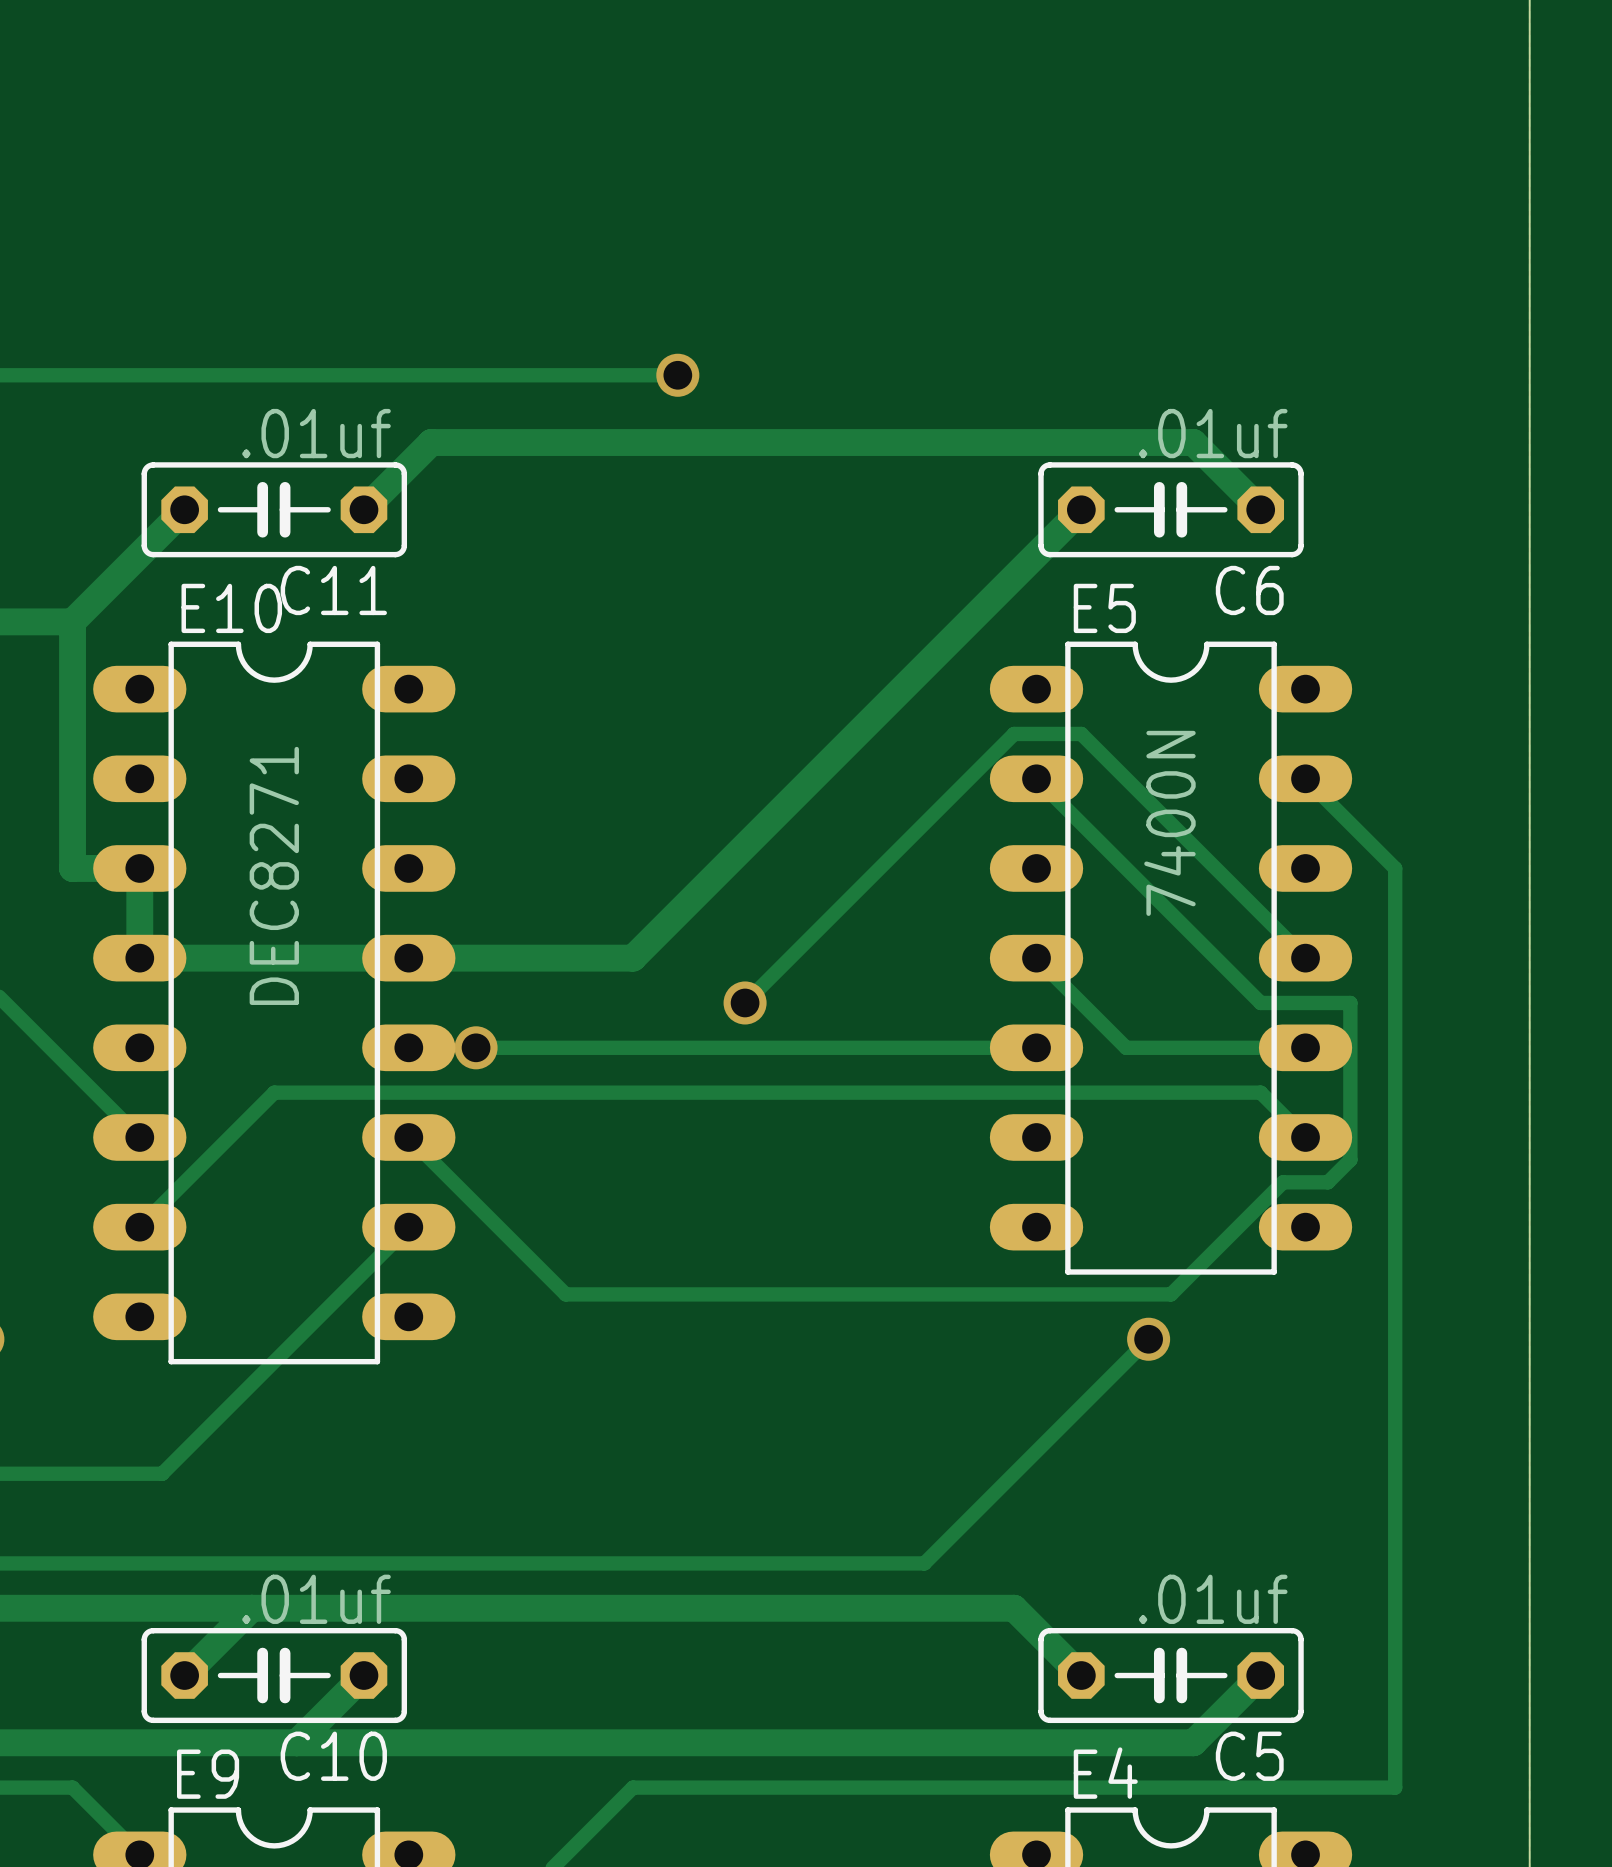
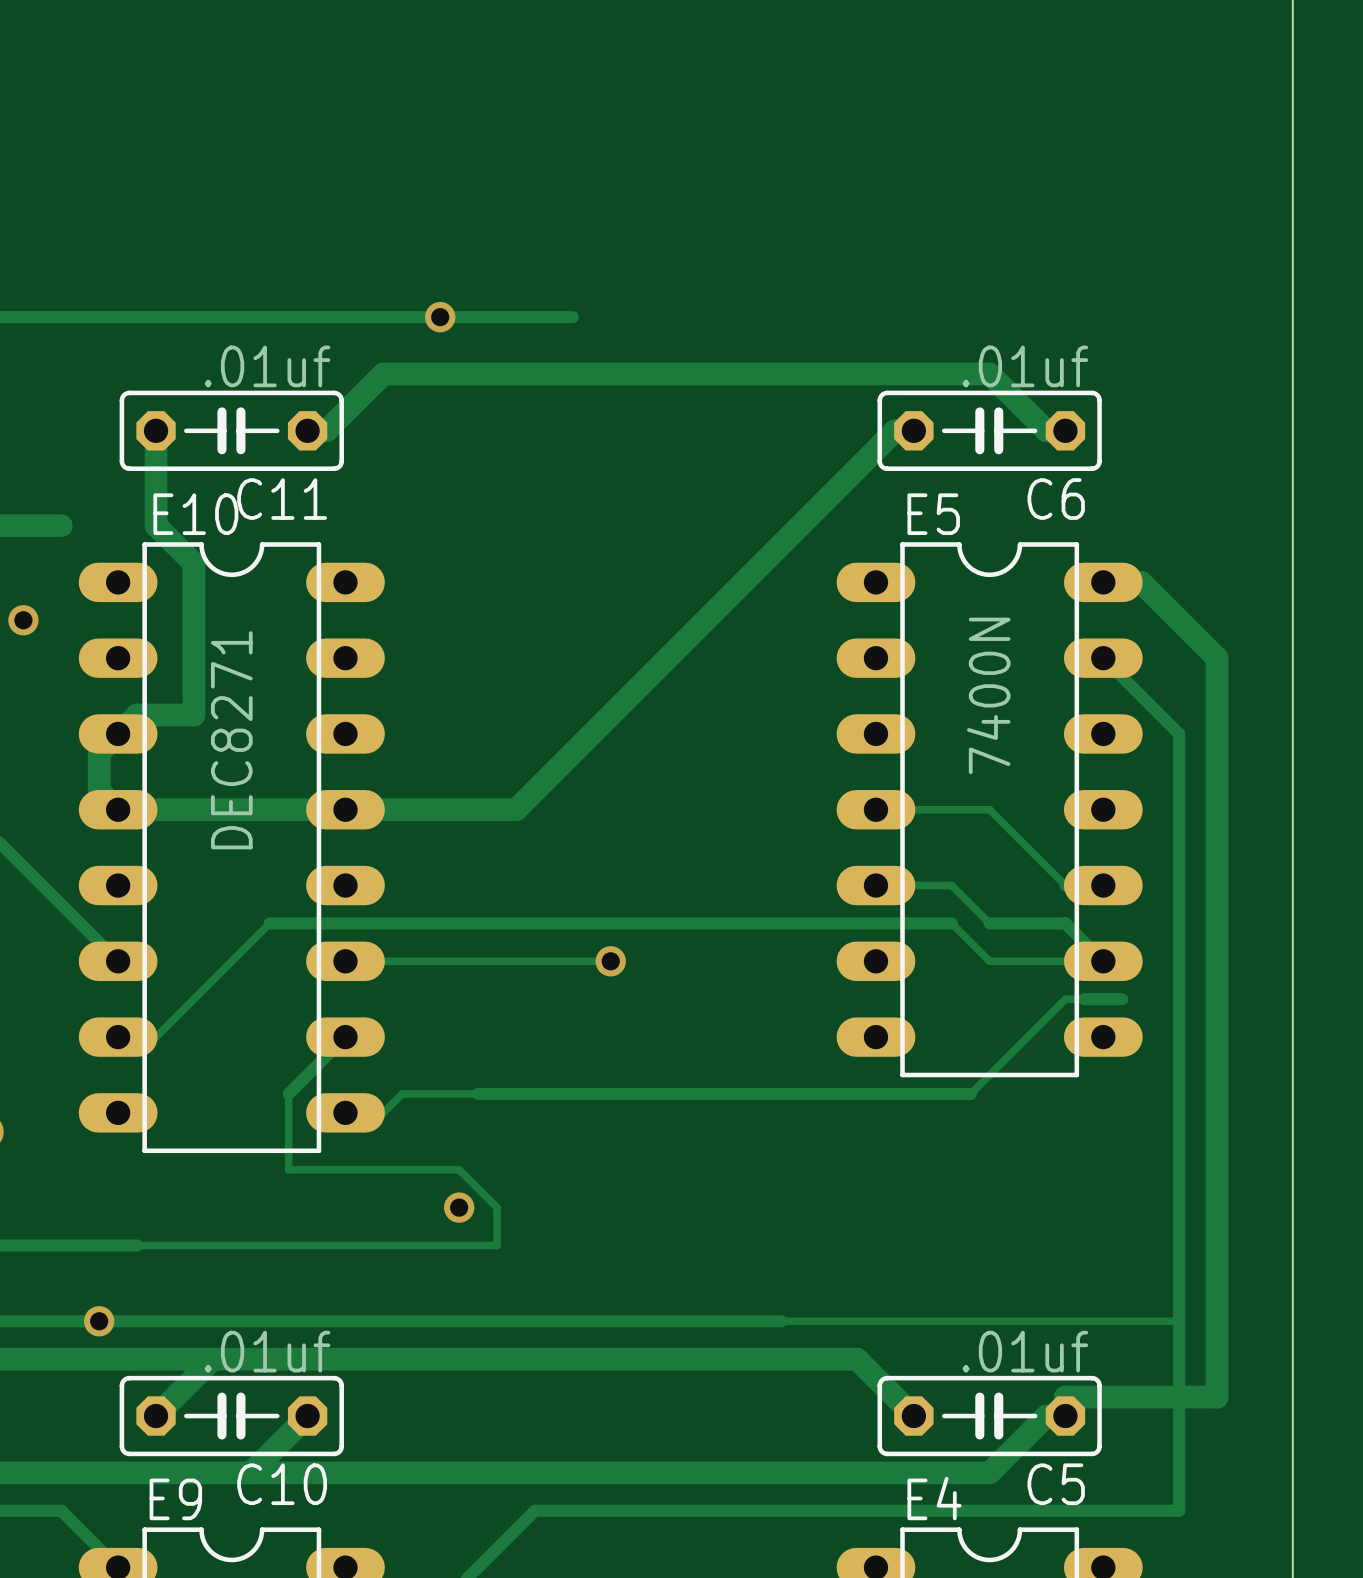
via: none -> (440, 317)
via: (677, 375) -> none
track: (453, 442) (431, 442) (363, 509) -> (383, 373) (326, 430) (307, 430)
track: (1171, 442) (1193, 442) (1260, 509) -> (989, 373) (1046, 430) (1065, 430)
track: (184, 509) (72, 621) (72, 868) (139, 868) (139, 958) -> (156, 430) (156, 525) (193, 563) (193, 715) (137, 715) (99, 752) (99, 790) (118, 809)
track: (1081, 509) (632, 958) (610, 958) -> (913, 430) (894, 430) (516, 809)
via: none -> (23, 620)
track: (1036, 778) (1260, 1002) (1350, 1002) (1350, 1159) (1327, 1182) -> none
track: (1036, 958) (1126, 1047) (1260, 1047) -> (875, 809) (989, 809) (1065, 885)
track: (1305, 958) (1081, 733) (1014, 733) (745, 1002) -> none
via: (745, 1002) -> none
track: (476, 1047) (1036, 1047) -> none
via: (476, 1047) -> none
track: (319, 1092) (274, 1092) (139, 1227) -> (269, 923) (156, 1037) (118, 1037)
track: (1126, 1092) (1171, 1092) -> (875, 885) (951, 885) (989, 923)
track: none -> (951, 923) (989, 961) (1103, 961)
track: (408, 1137) (565, 1294) -> (345, 1112) (383, 1112) (402, 1093) (478, 1093)
track: none -> (345, 961) (610, 961)
via: none -> (610, 961)
track: (1283, 1182) (1171, 1294) (1148, 1294) -> (1084, 999) (1065, 999) (970, 1093)
track: (341, 1294) (162, 1473) -> (288, 1093) (288, 1169) (459, 1169) (497, 1207) (497, 1245) (137, 1245)
track: (1148, 1339) (924, 1563) -> (1179, 1321) (781, 1321)
via: (1148, 1339) -> none
via: none -> (459, 1207)
via: none -> (99, 1321)
track: (1260, 1675) (1193, 1742) (1171, 1742) -> (1103, 582) (1141, 582) (1217, 658) (1217, 1397) (1065, 1397) (1065, 1416) (1046, 1416) (989, 1472)

